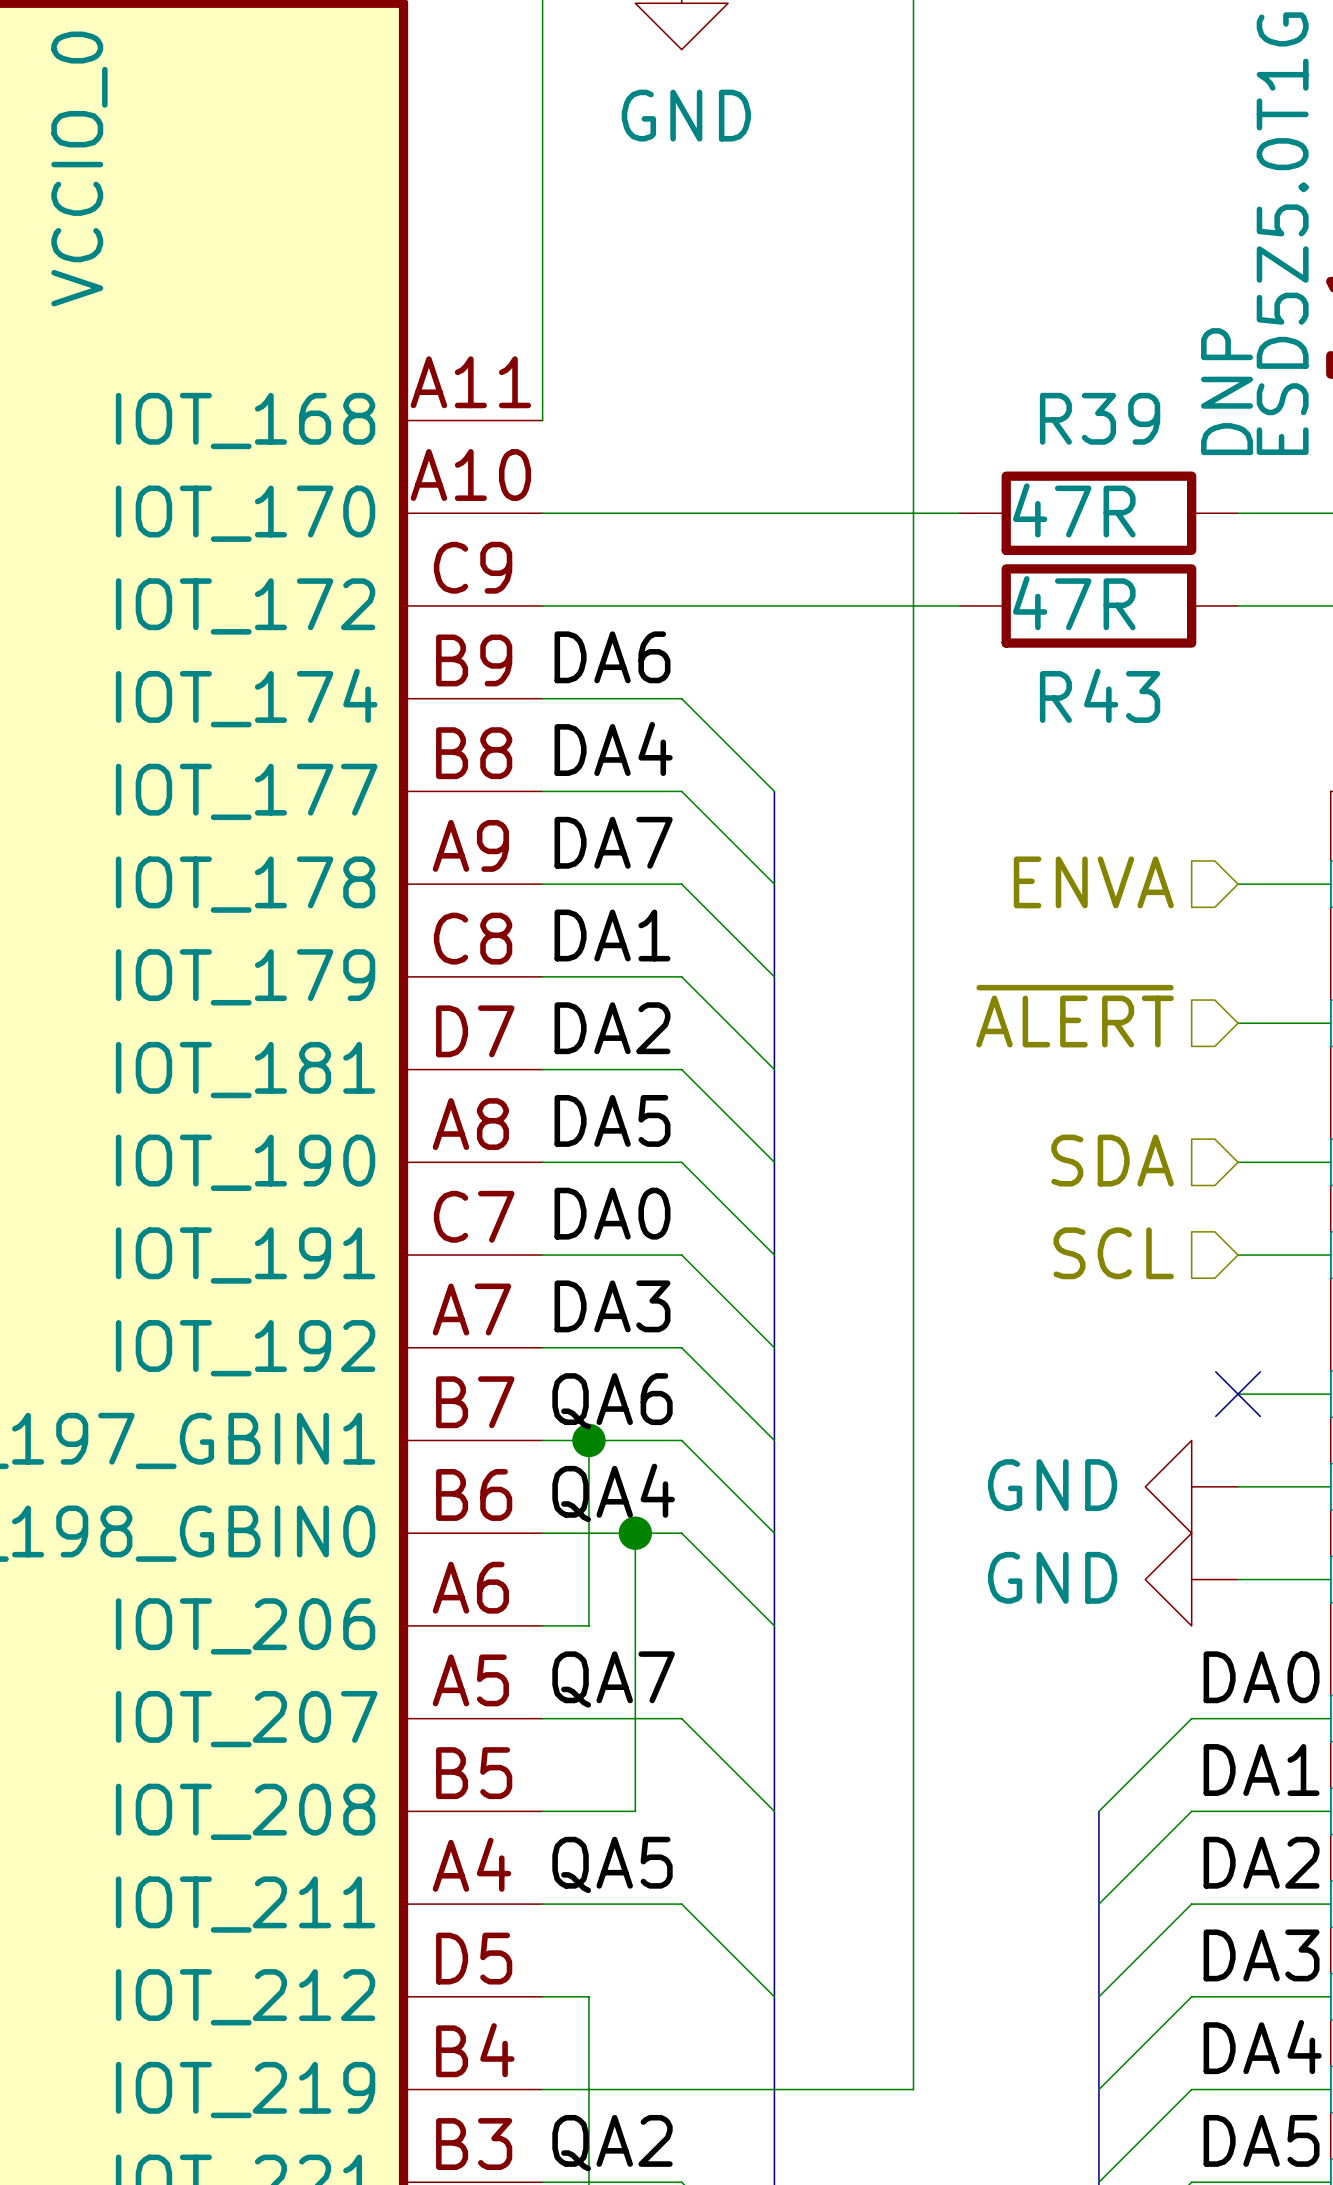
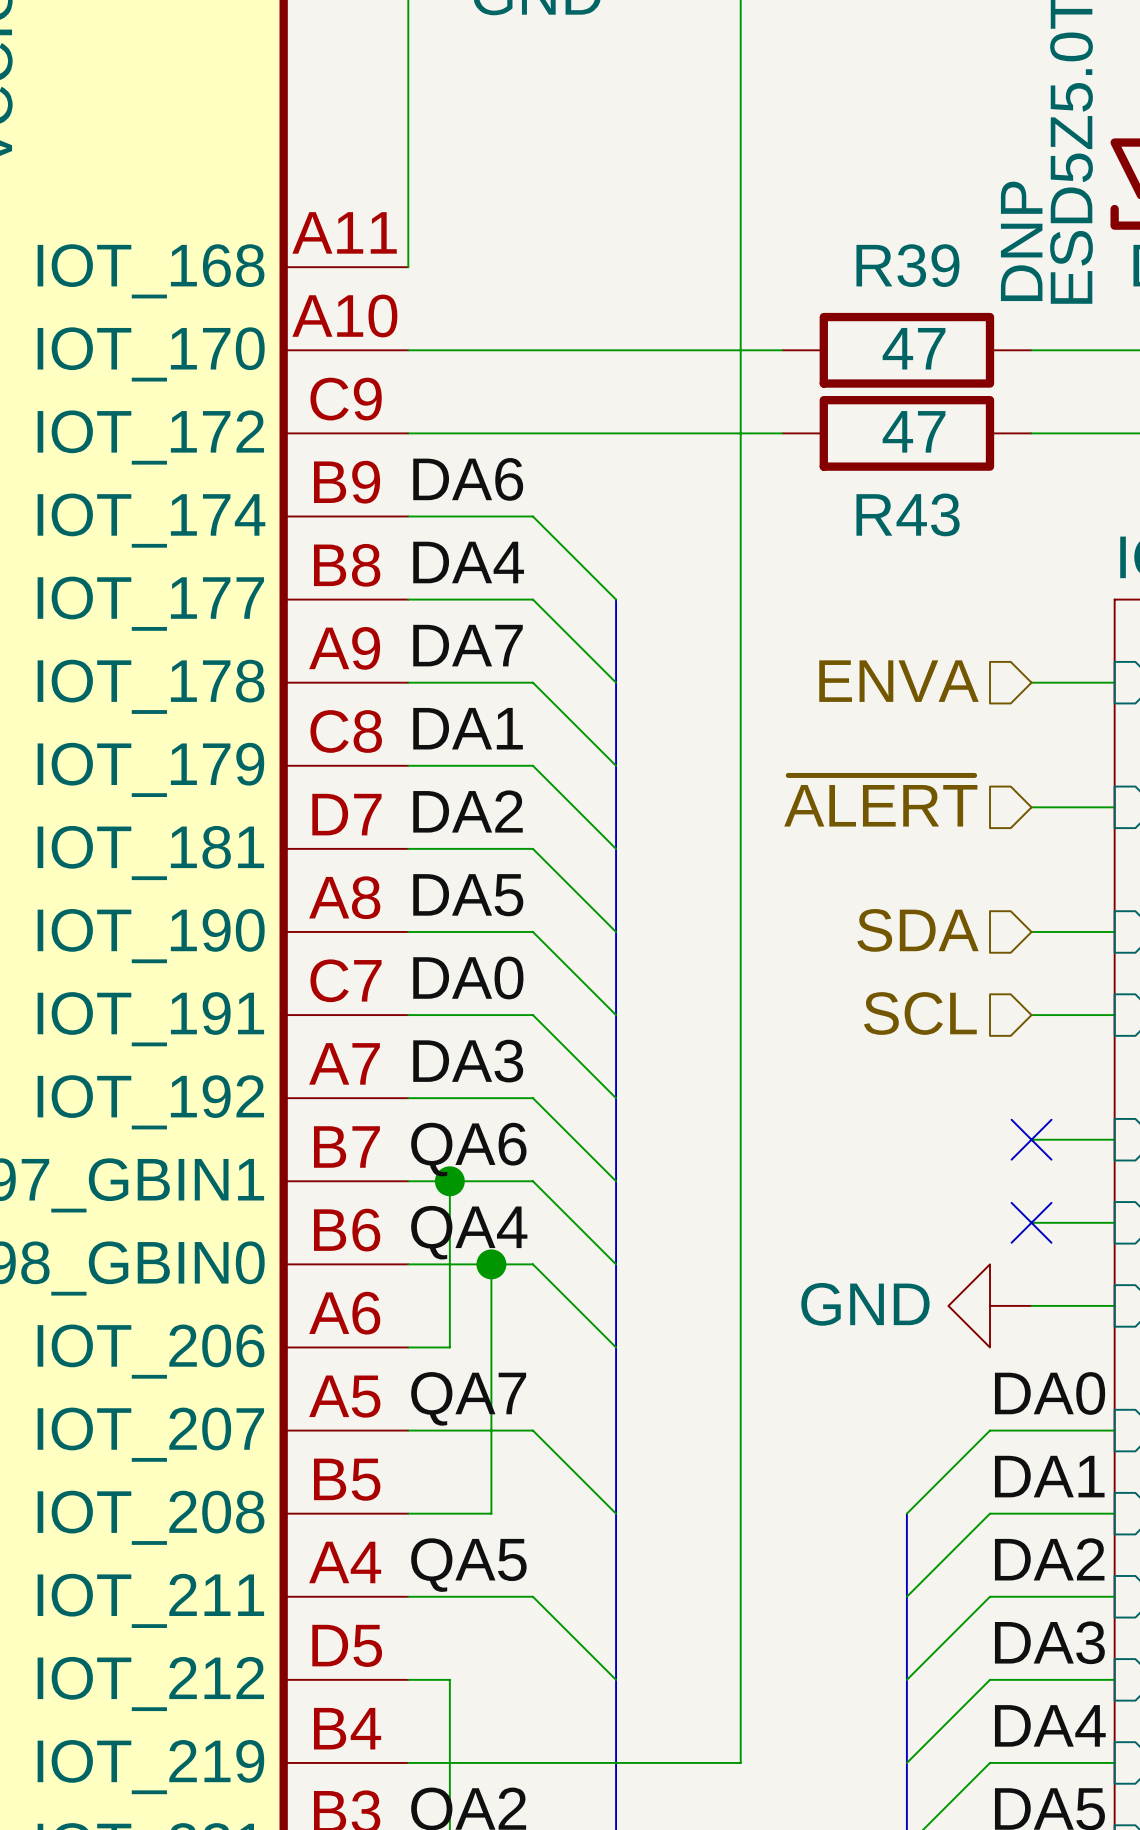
R39 value: 47R (1074, 510) -> 47 (914, 348)
R43 value: 47R (1074, 603) -> 47 (914, 431)
power symbol: GND (1191, 1486) -> none
no-connect mark: none -> (1031, 1222)

